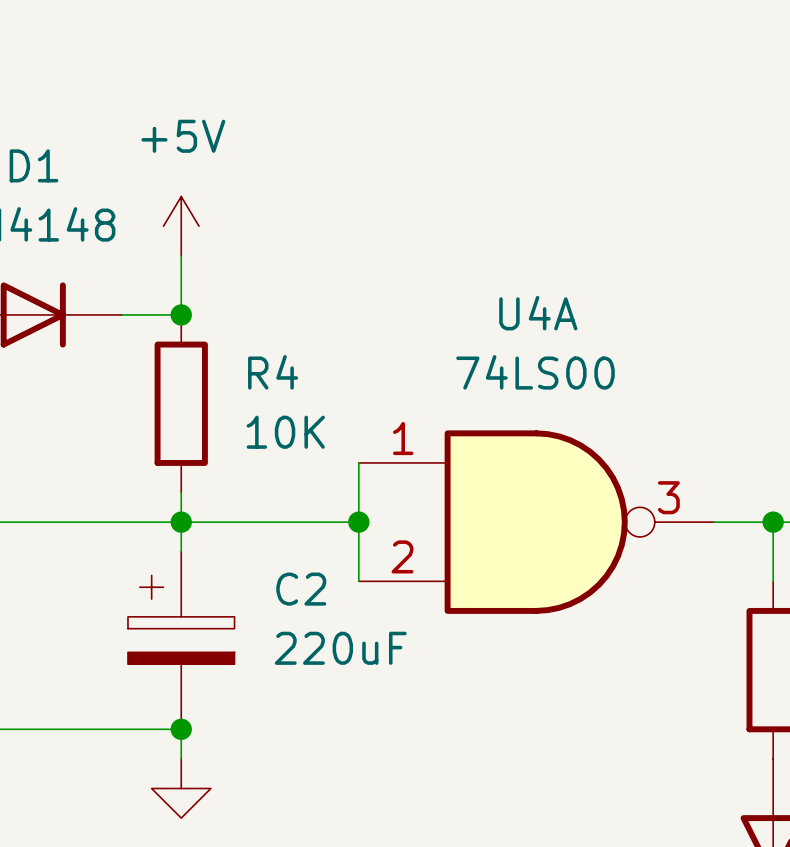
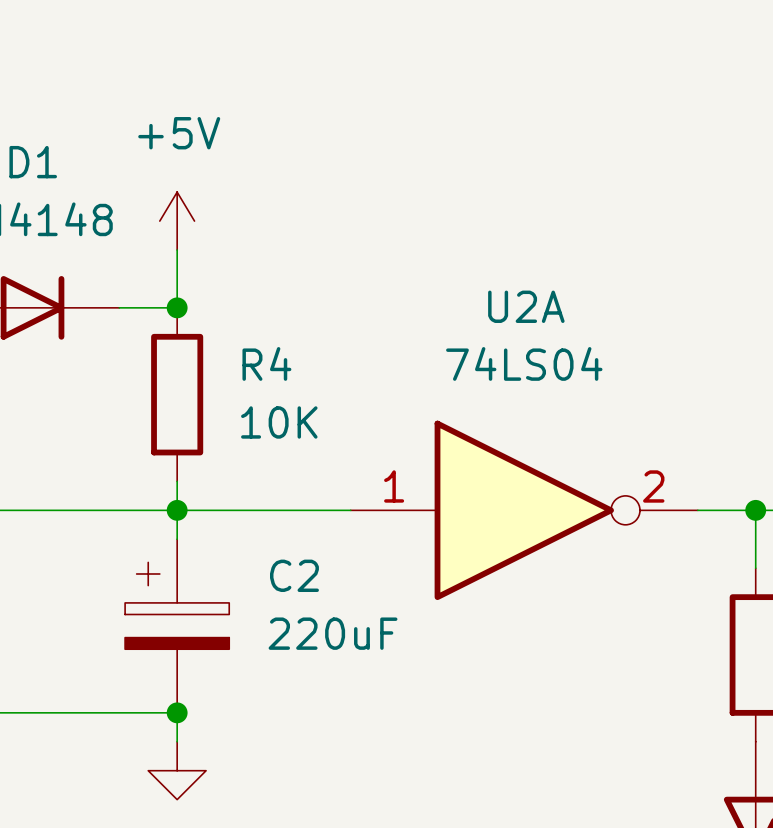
wire: (358, 462) (358, 581) -> none
junction: (358, 522) -> none
U4A: 74LS00 (536, 522) -> none
U2A: none -> 74LS04 (524, 510)

